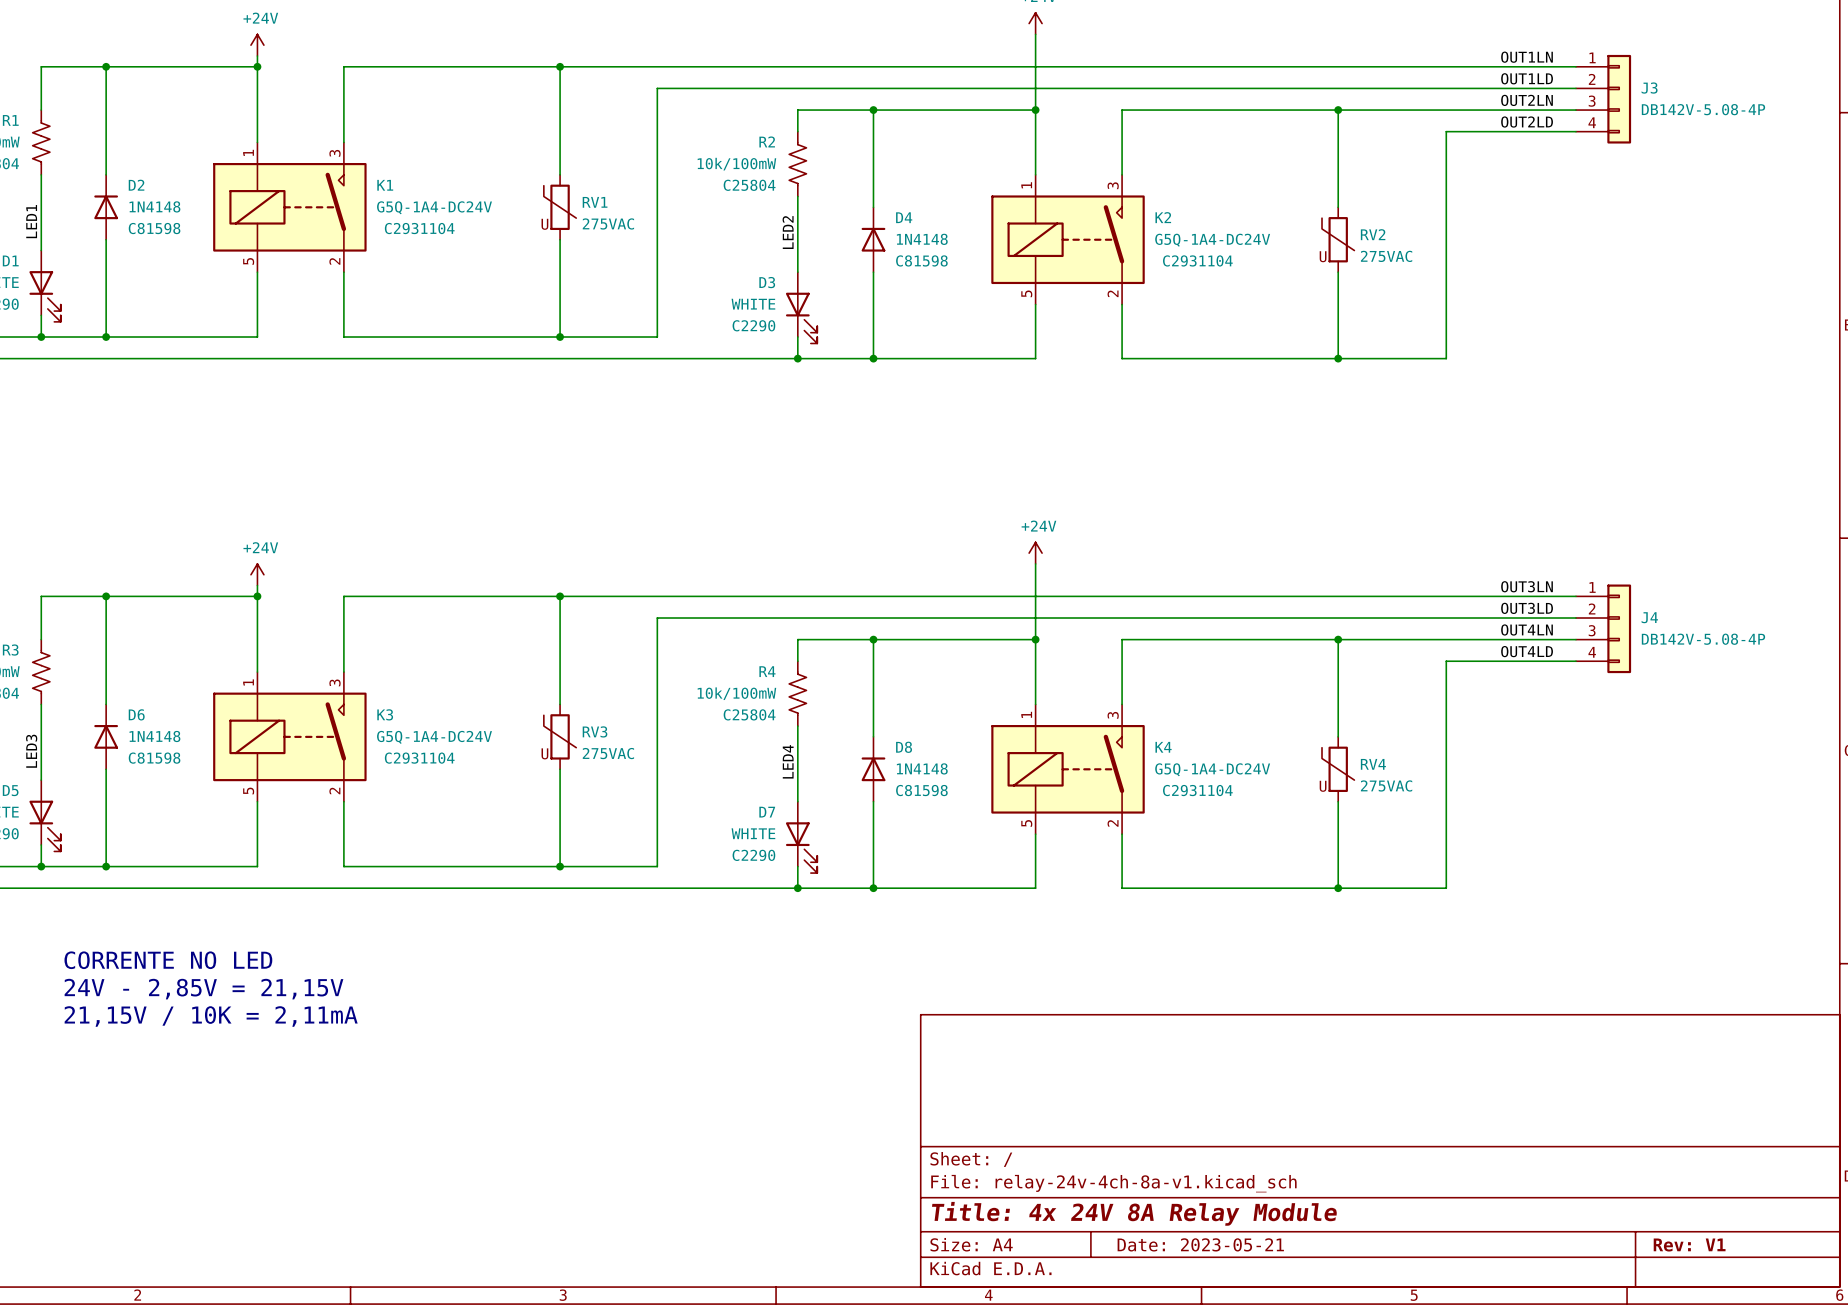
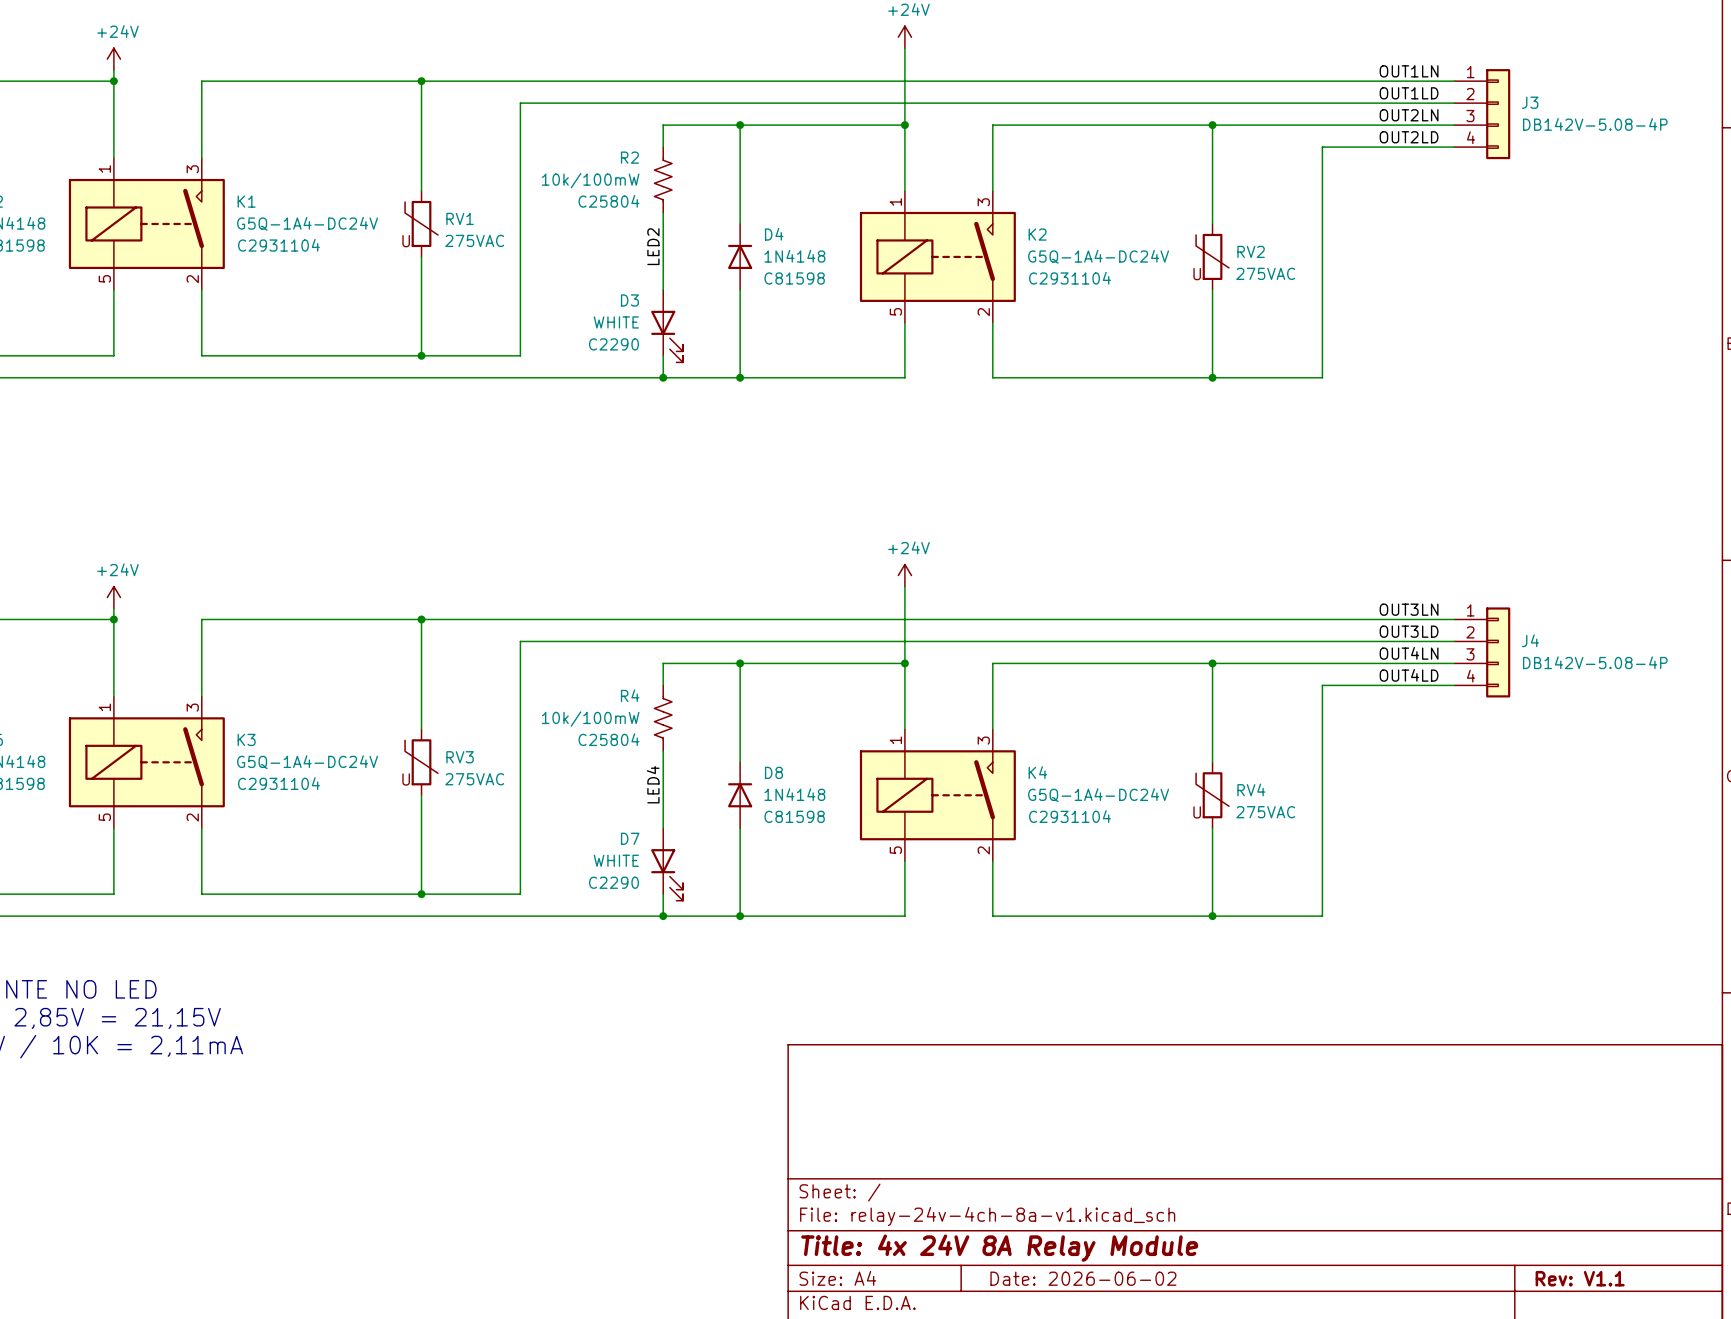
title block: Date: 2023-05-21 (1200, 1244) -> Date: 2026-06-02 (1083, 1278)
title block: Rev: V1 (1689, 1245) -> Rev: V1.1 (1580, 1278)

